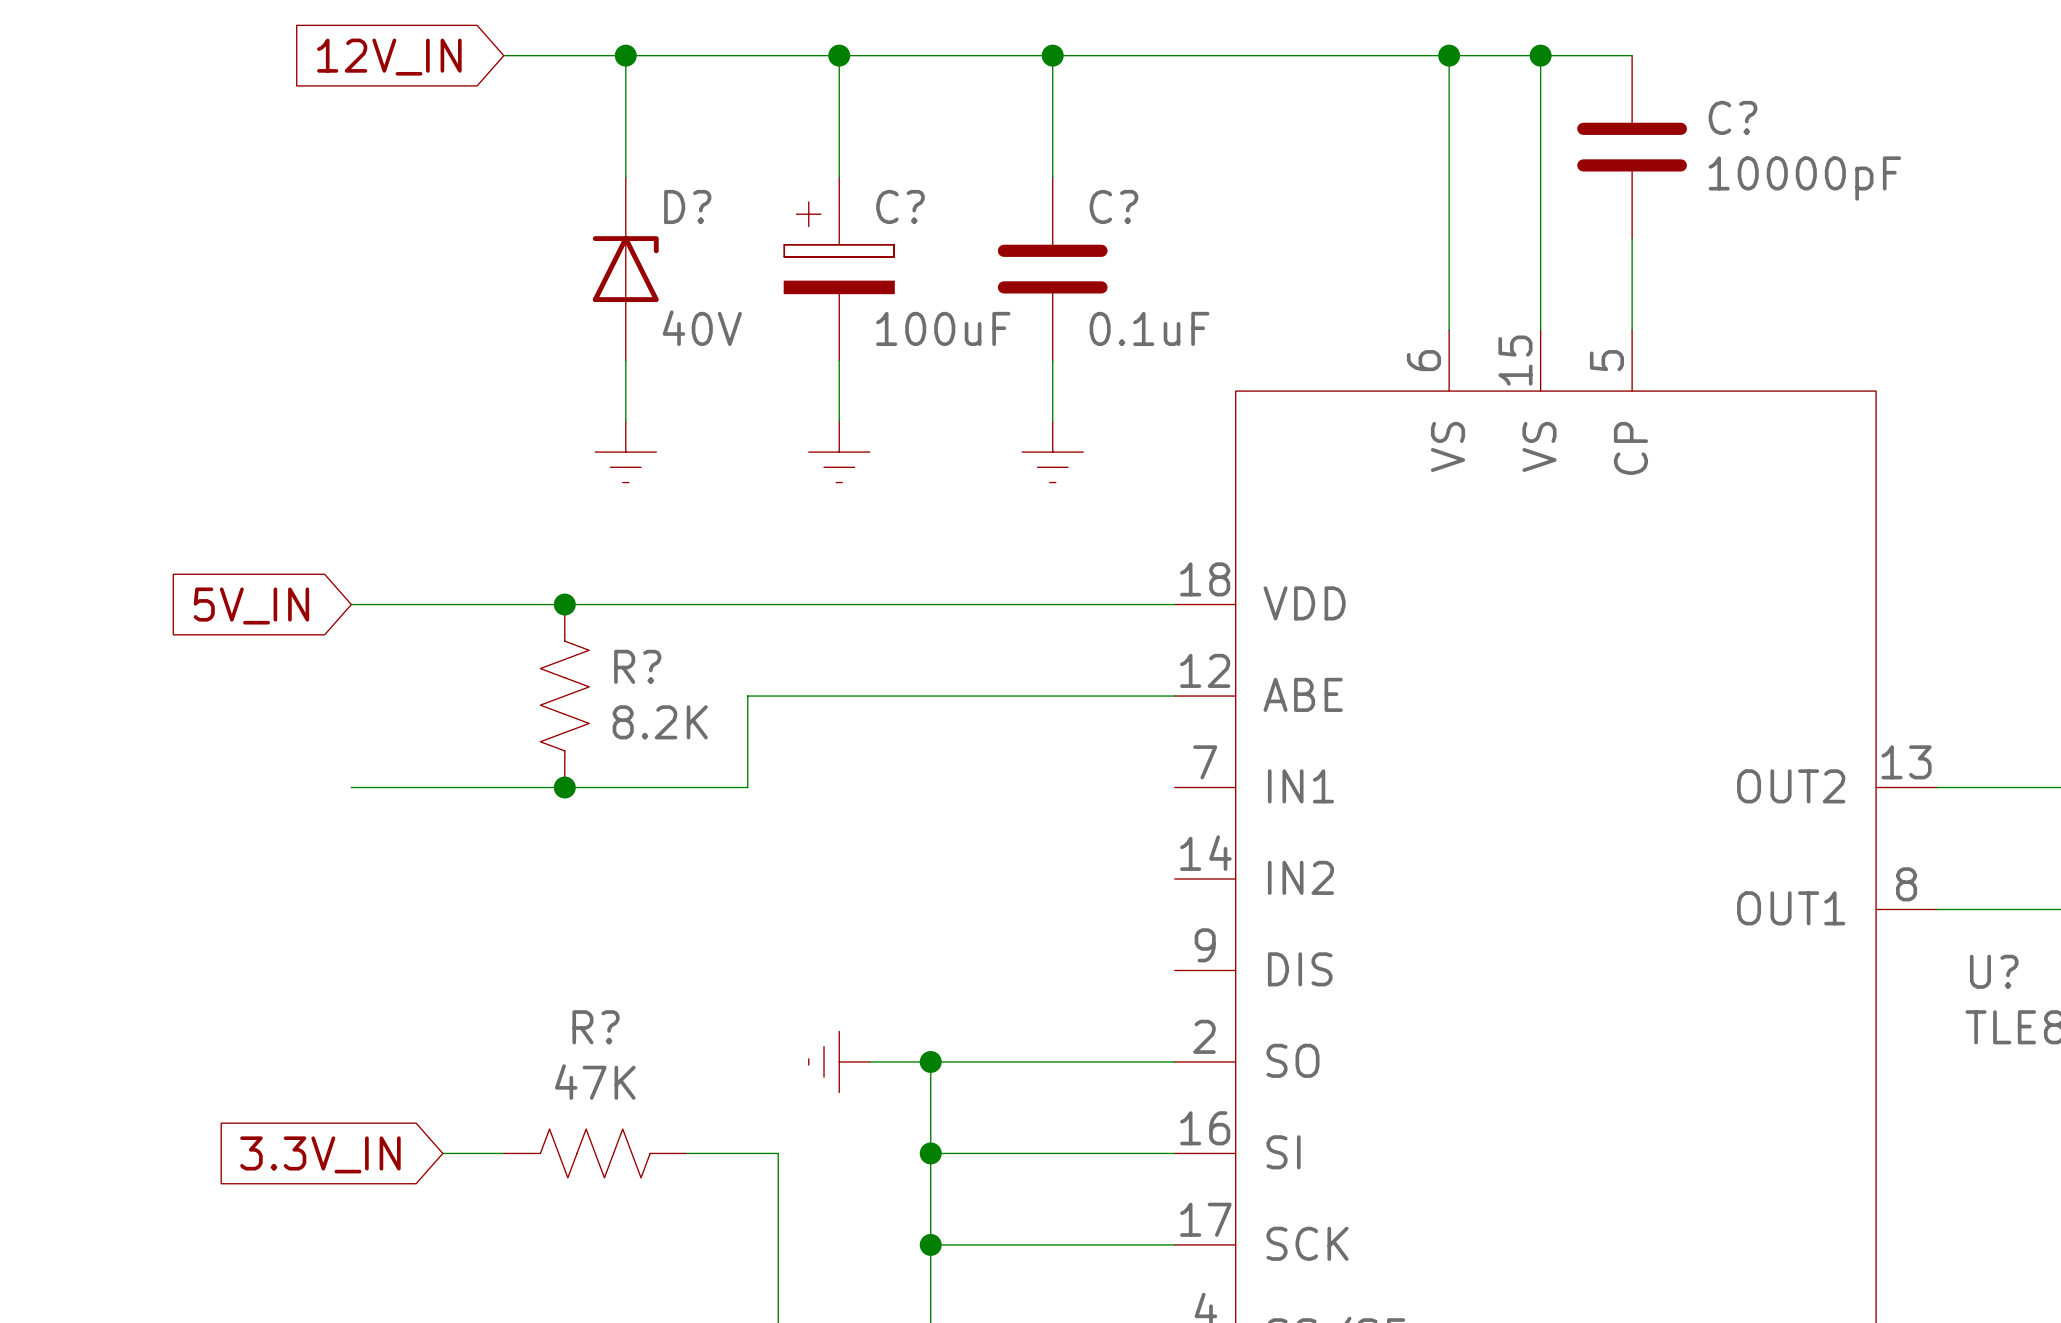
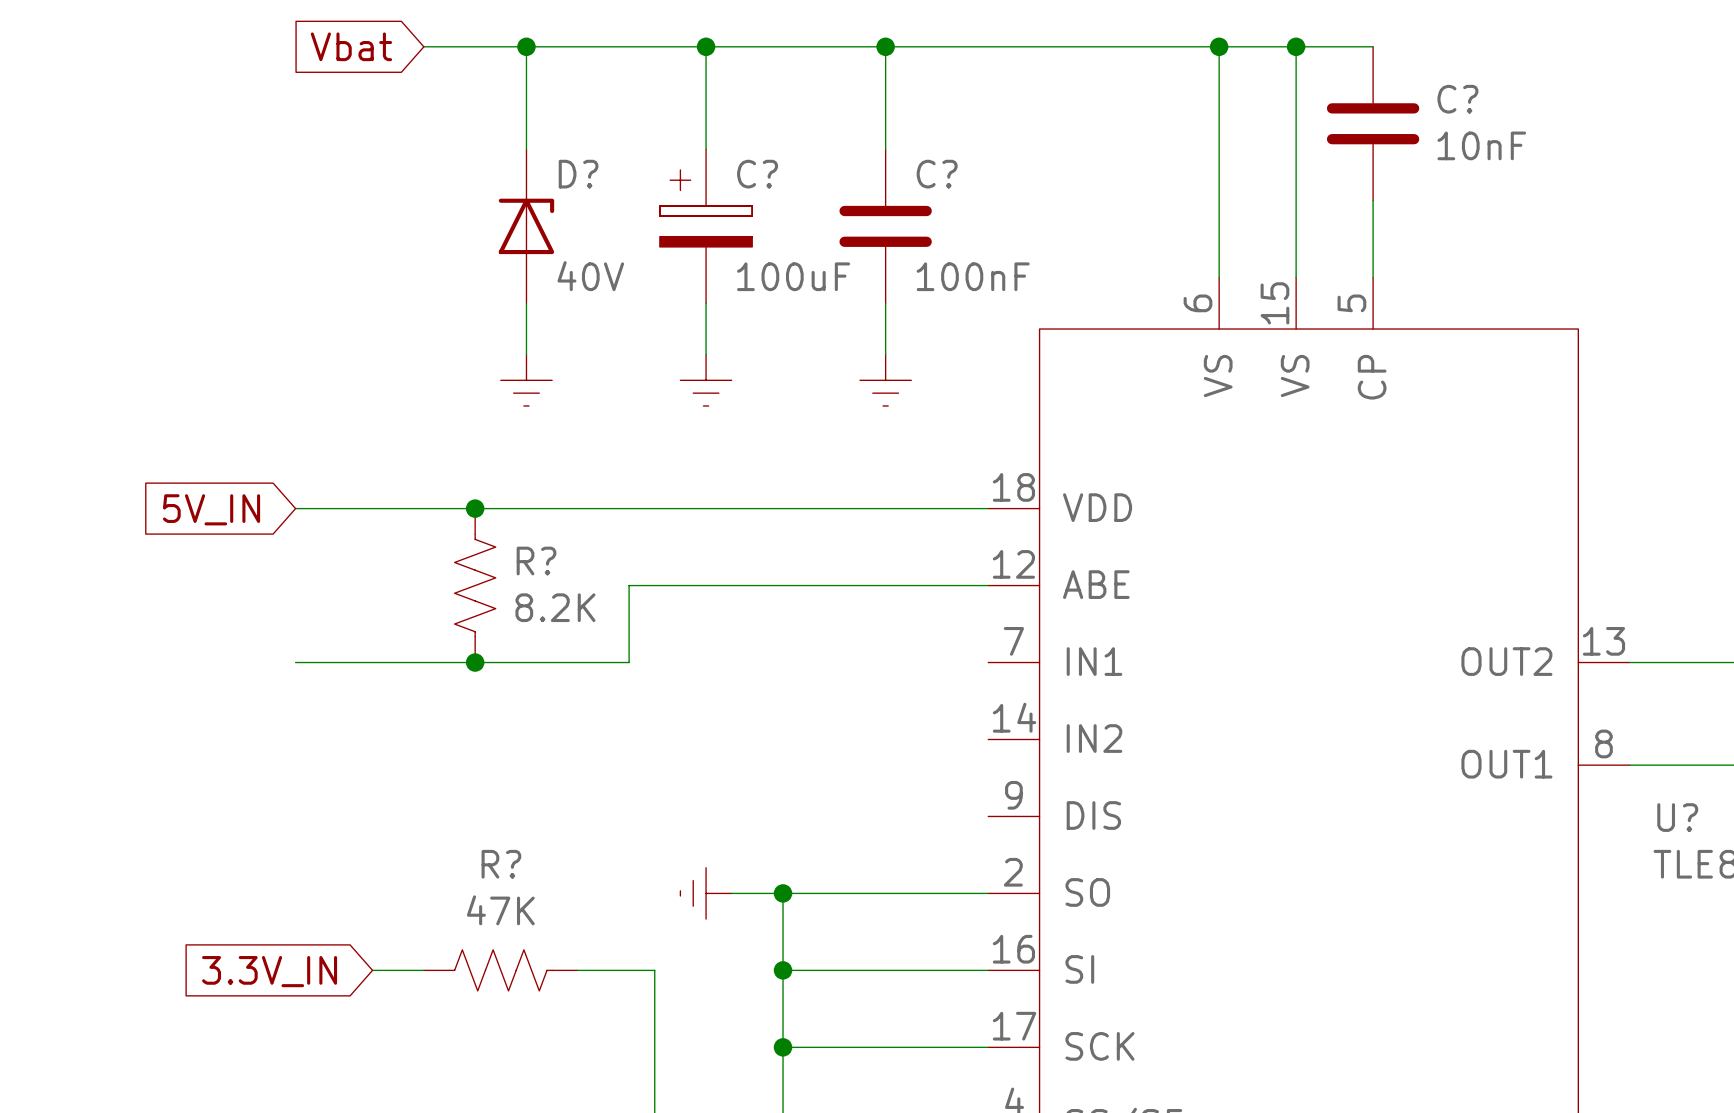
global label: 12V_IN (389, 57) -> Vbat (351, 46)
C? value: 10000pF (1804, 178) -> 10nF (1481, 145)
C? value: 0.1uF (1149, 328) -> 100nF (973, 276)

